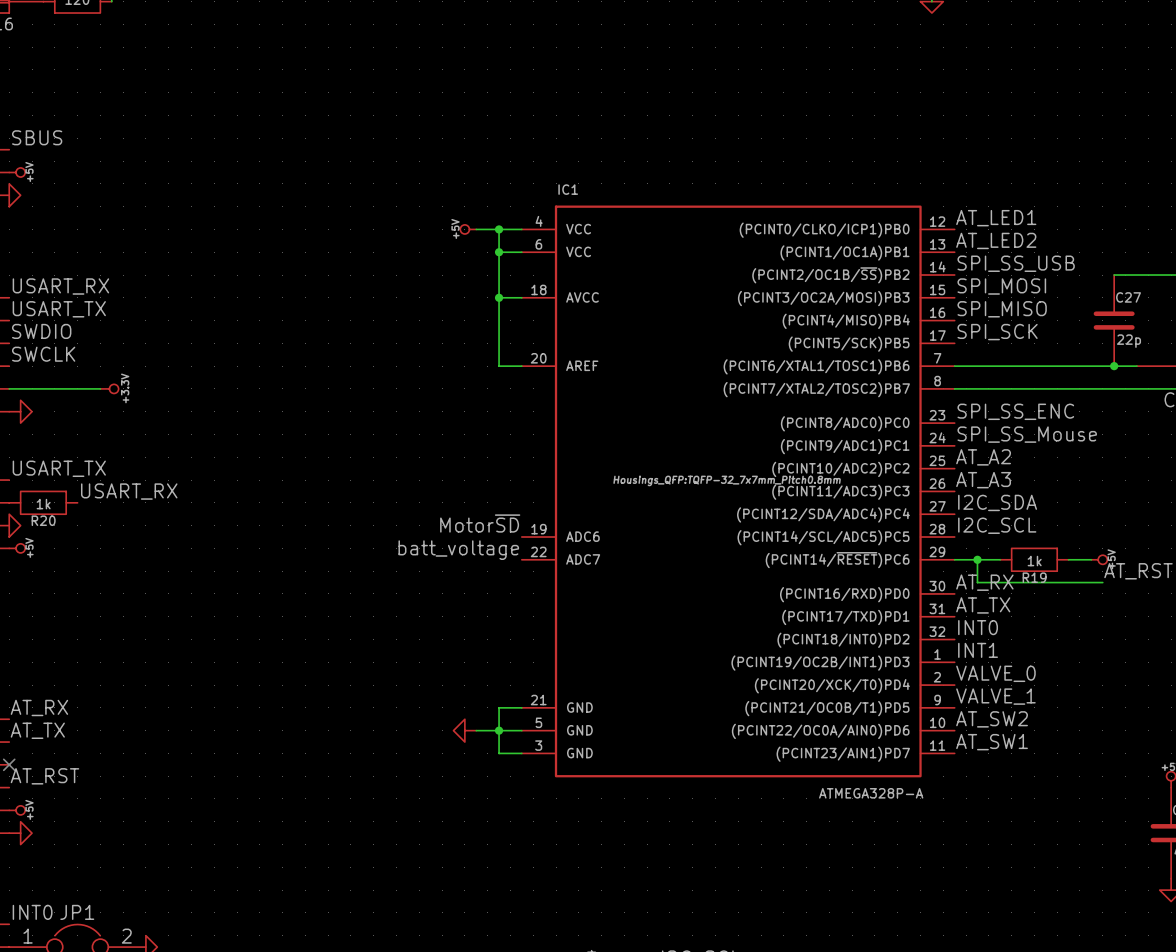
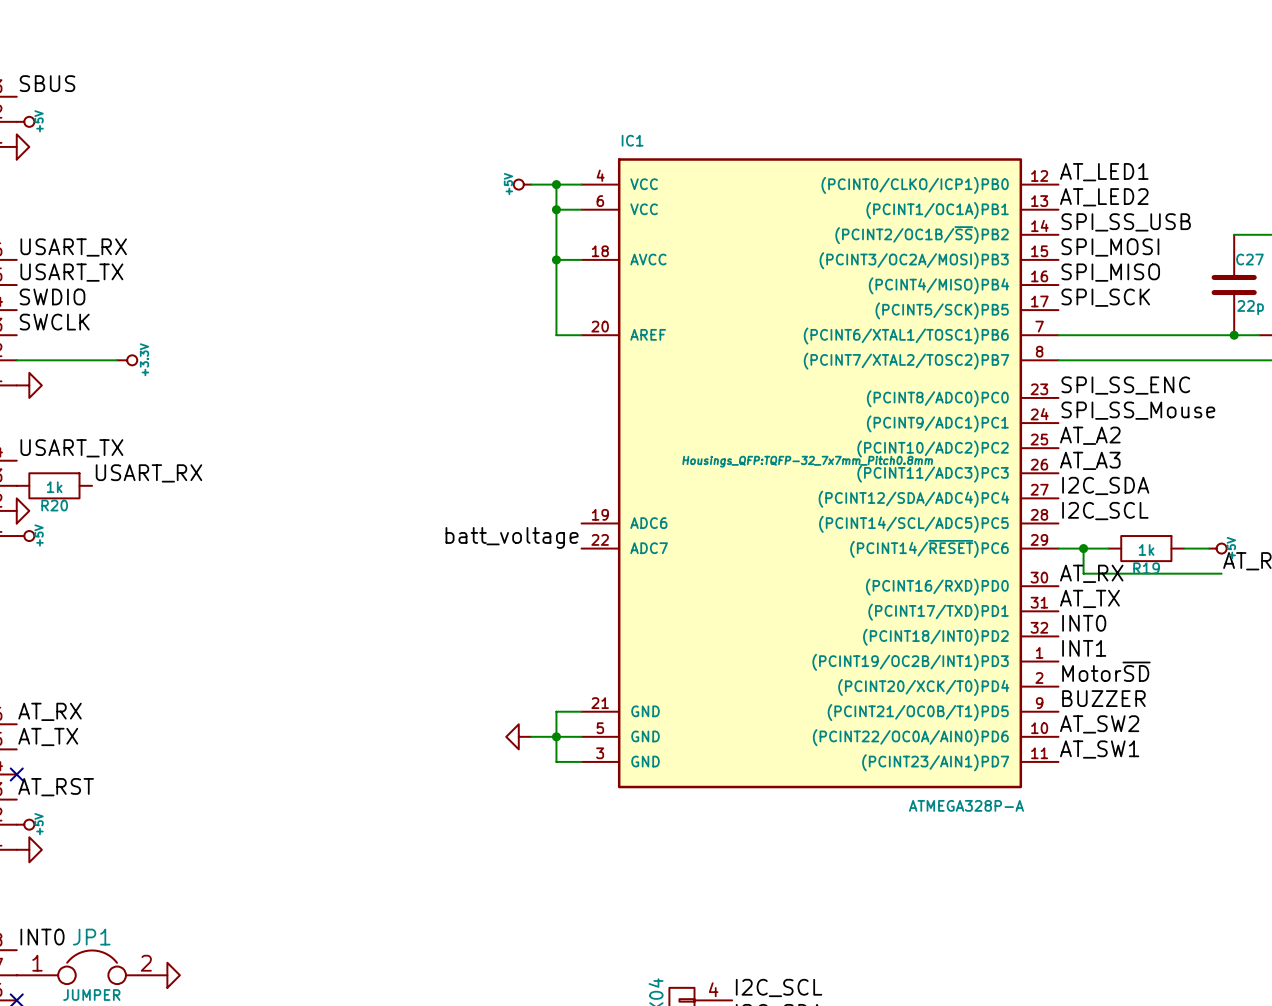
label: Motor~{SD} (480, 523) -> none
label: VALVE_0 (995, 673) -> Motor~{SD} (1106, 671)
label: VALVE_1 (995, 696) -> BUZZER (1103, 698)

